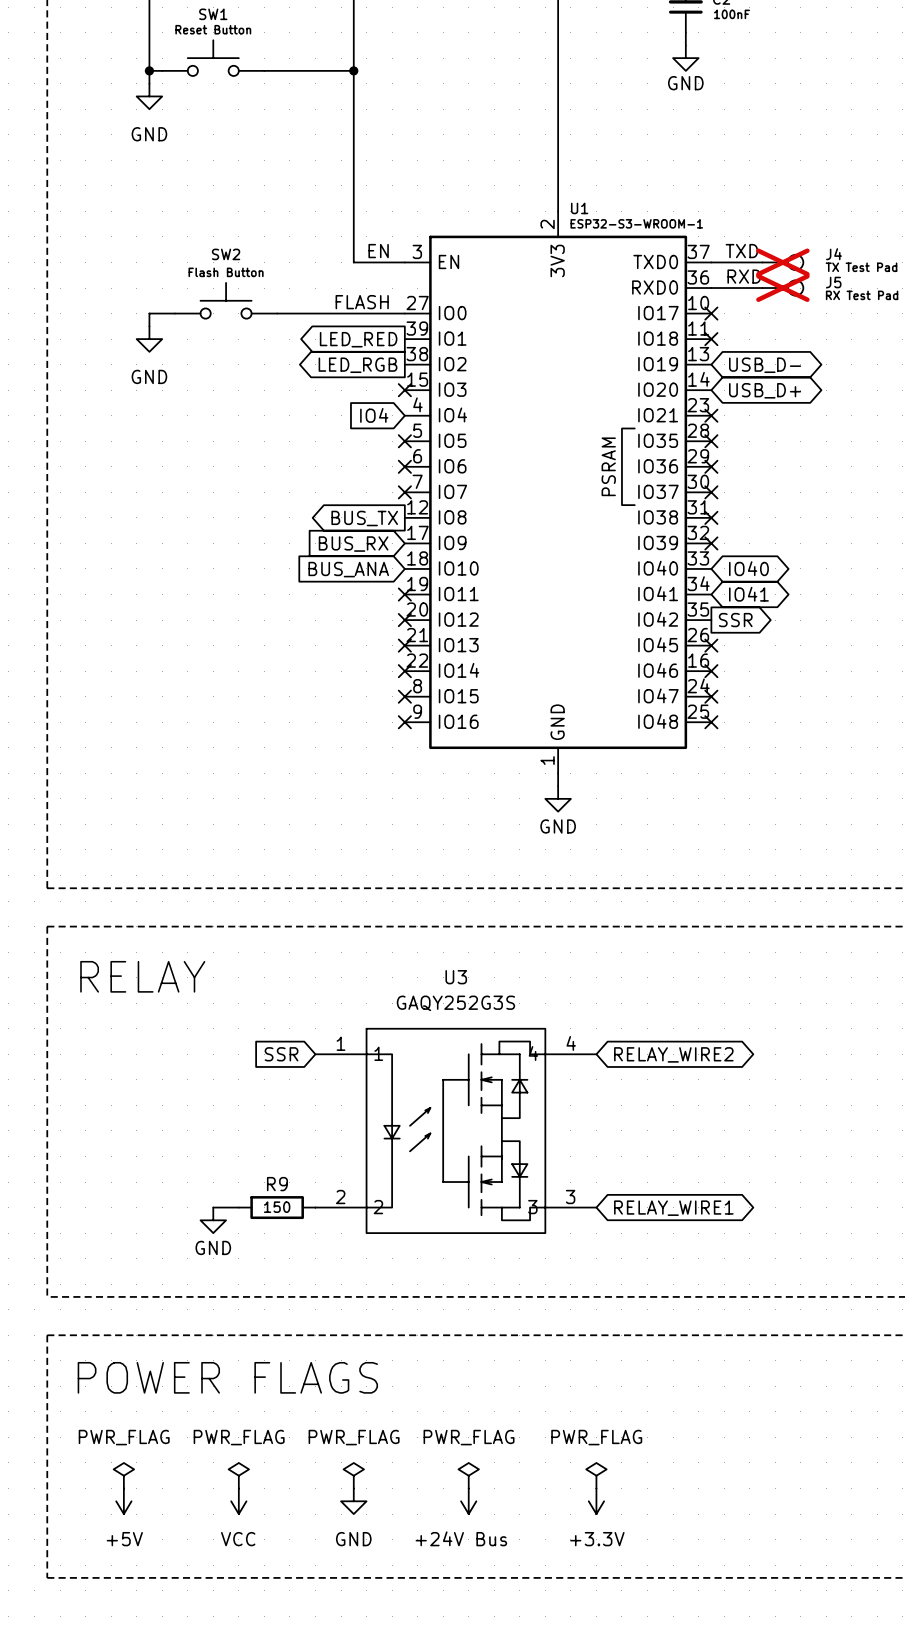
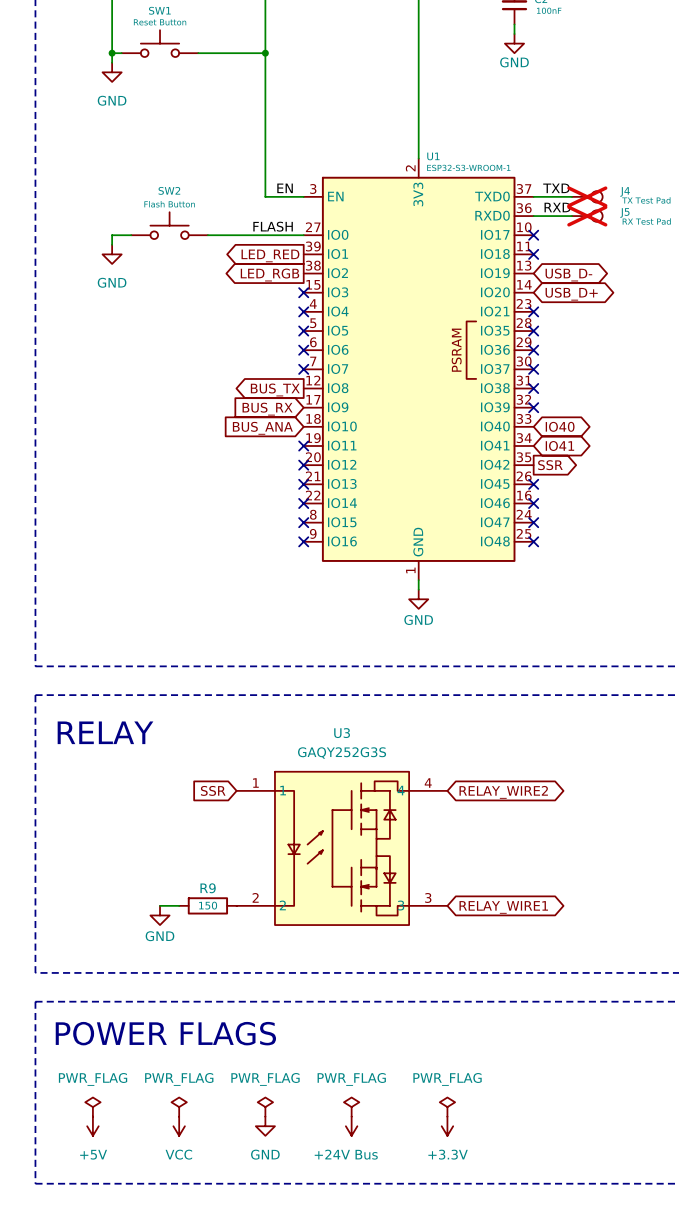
global label: IO4 (374, 415) -> none
no-connect mark: none -> (303, 311)

